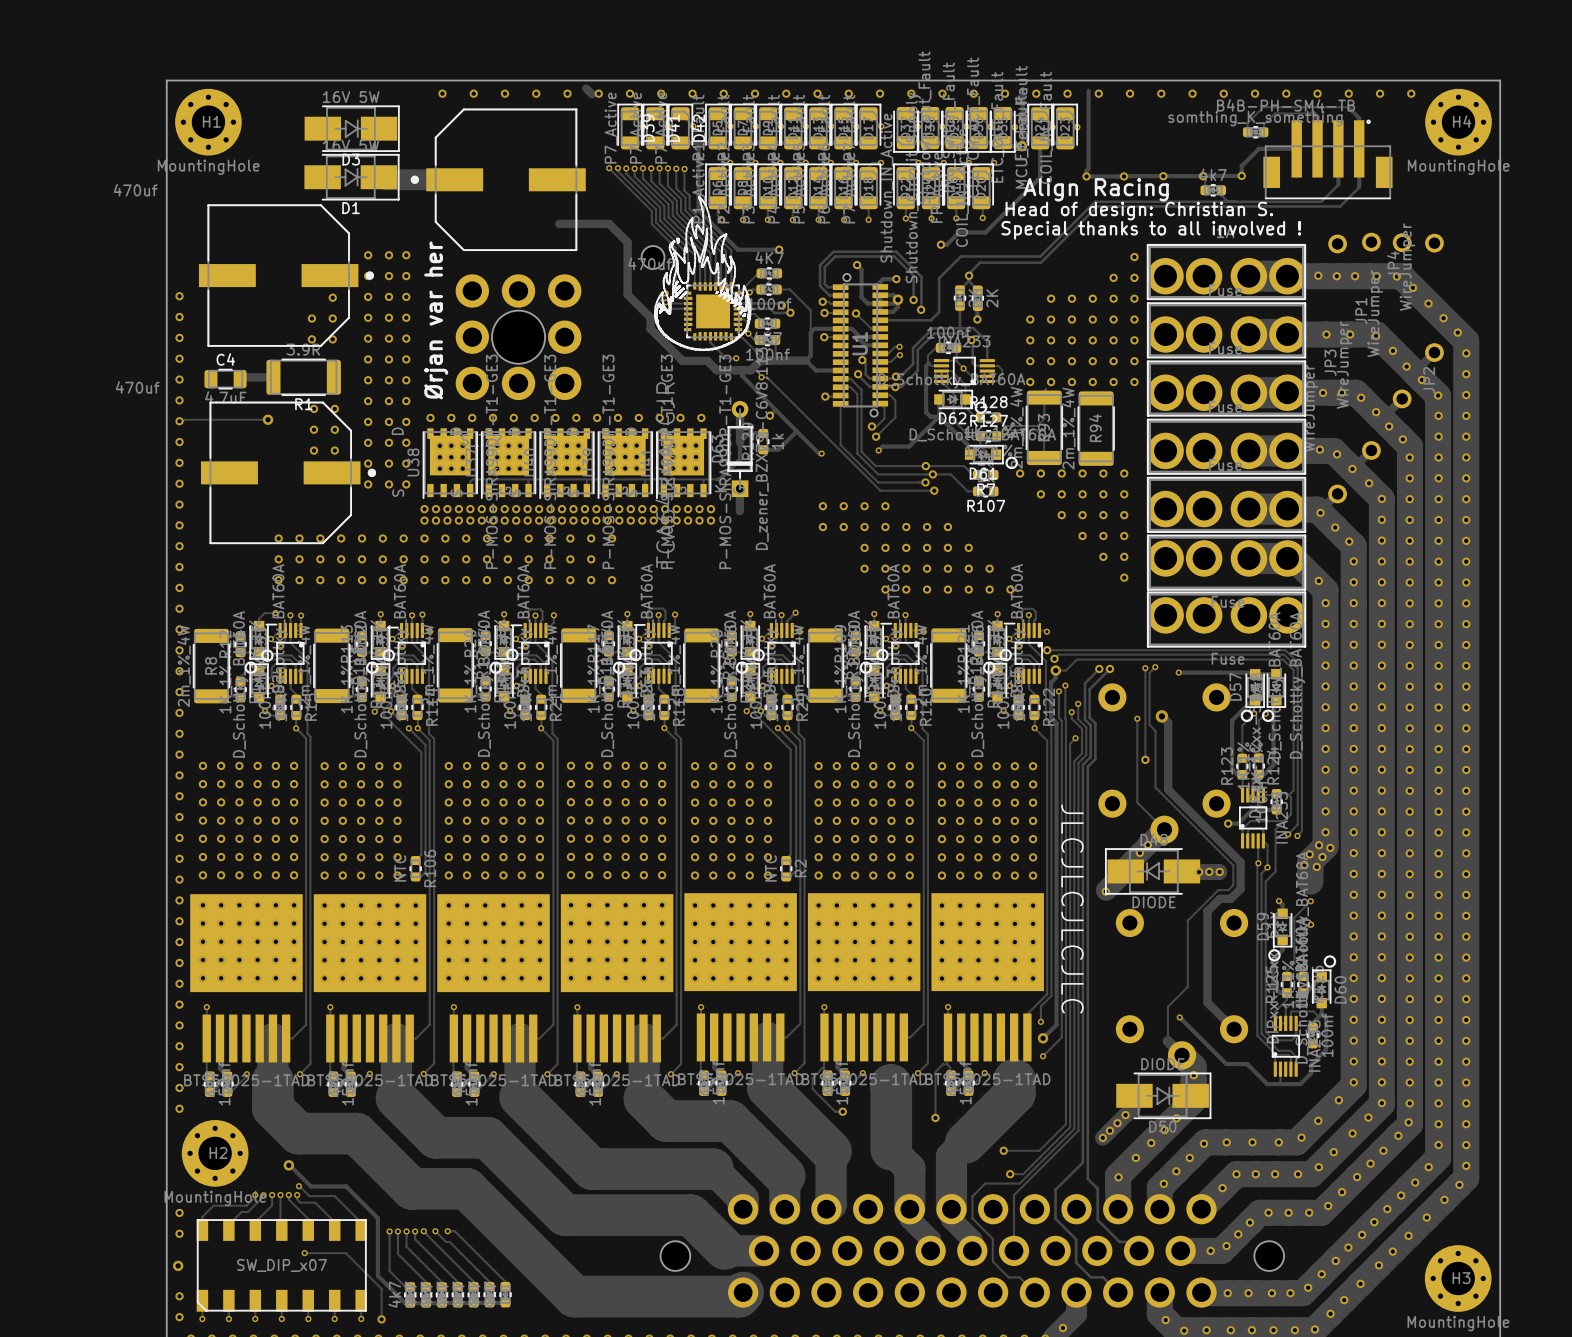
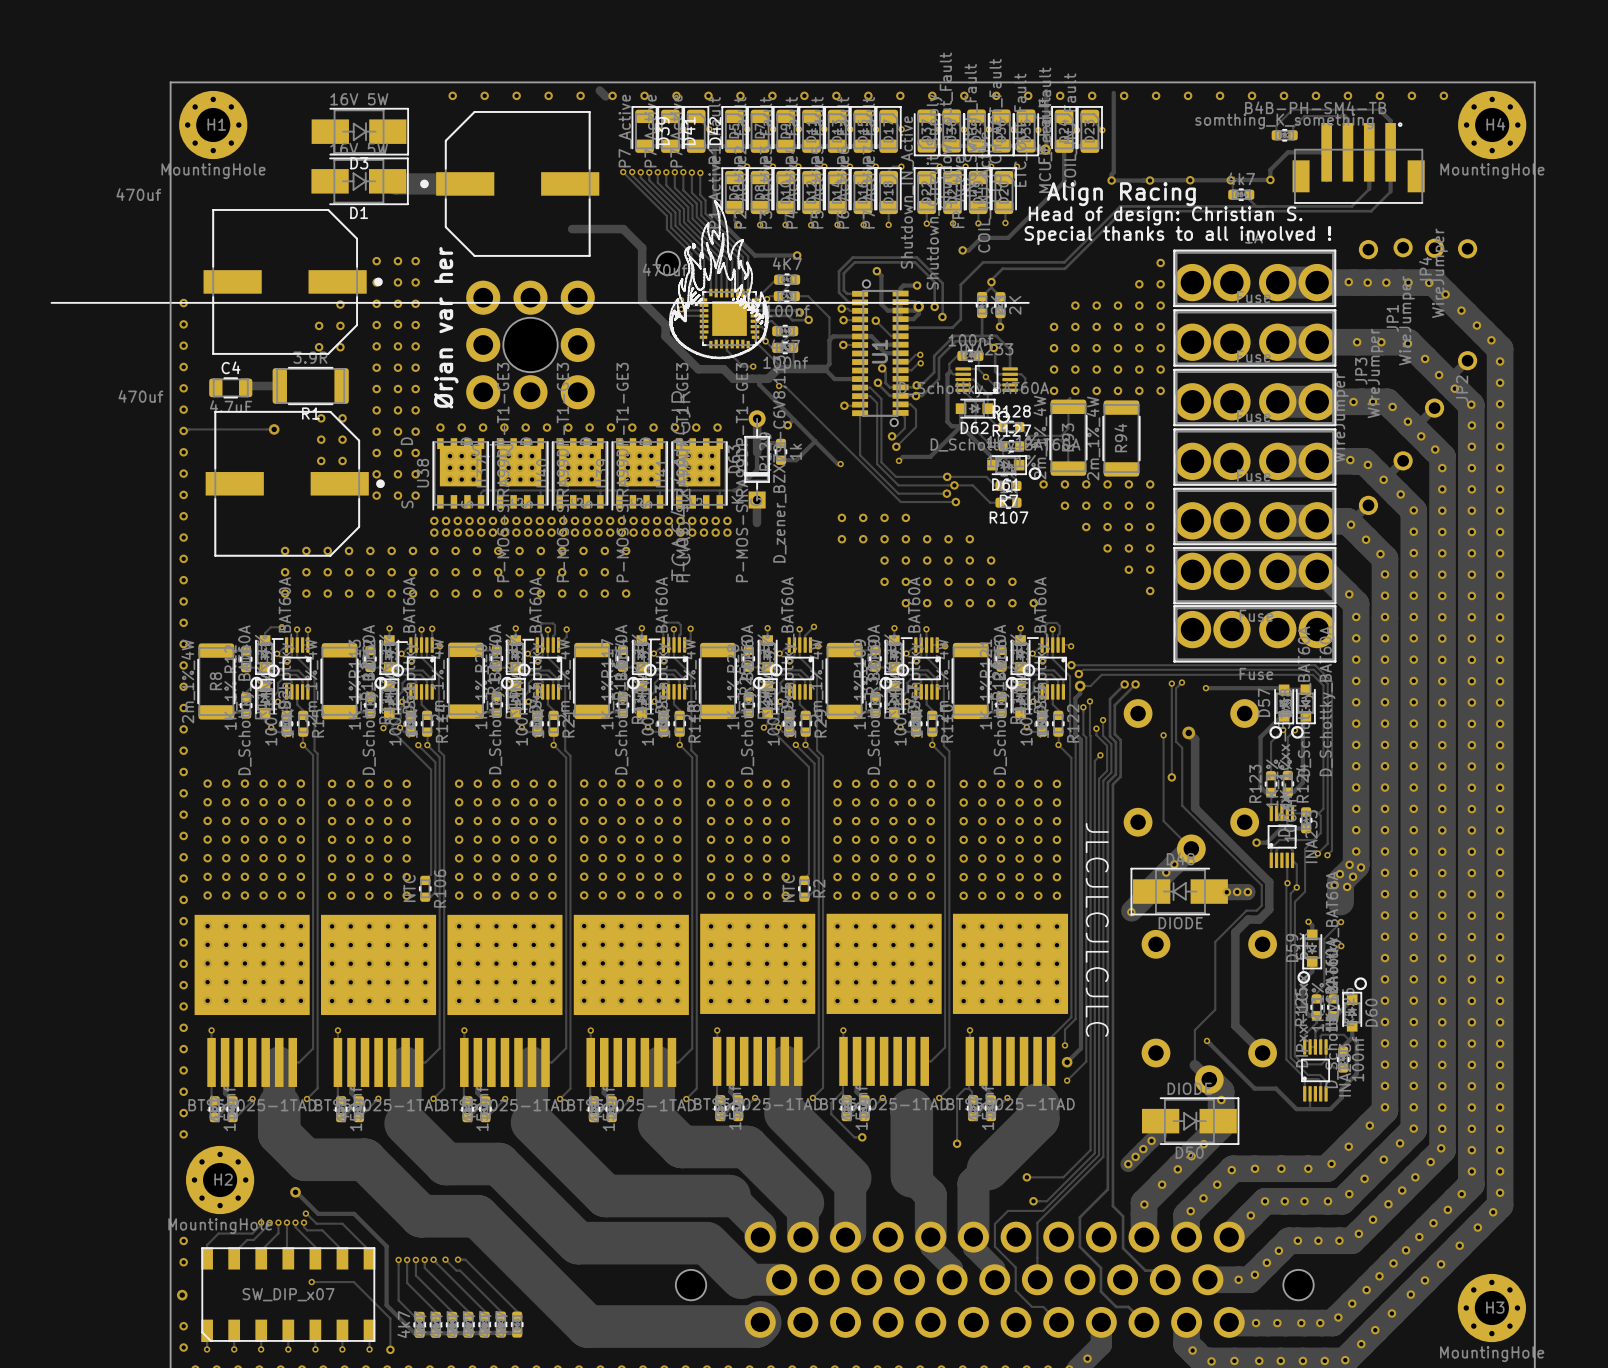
line: none -> (51, 302) (1028, 302)

